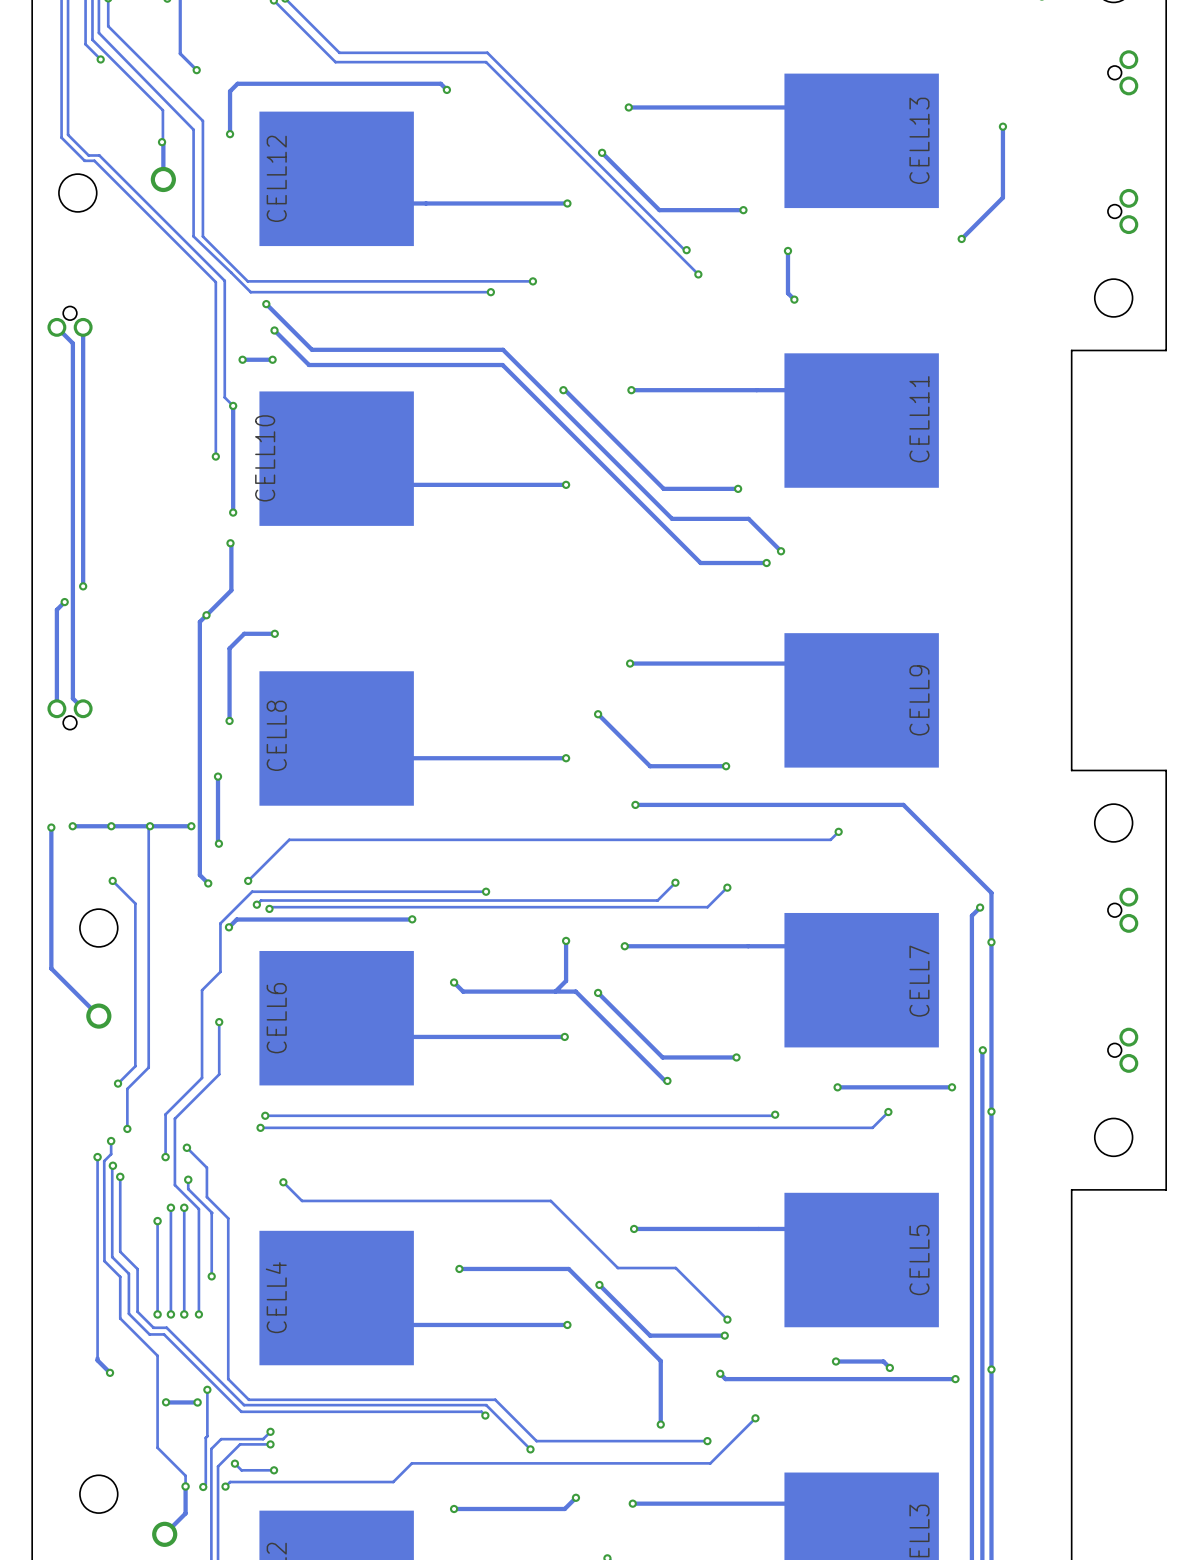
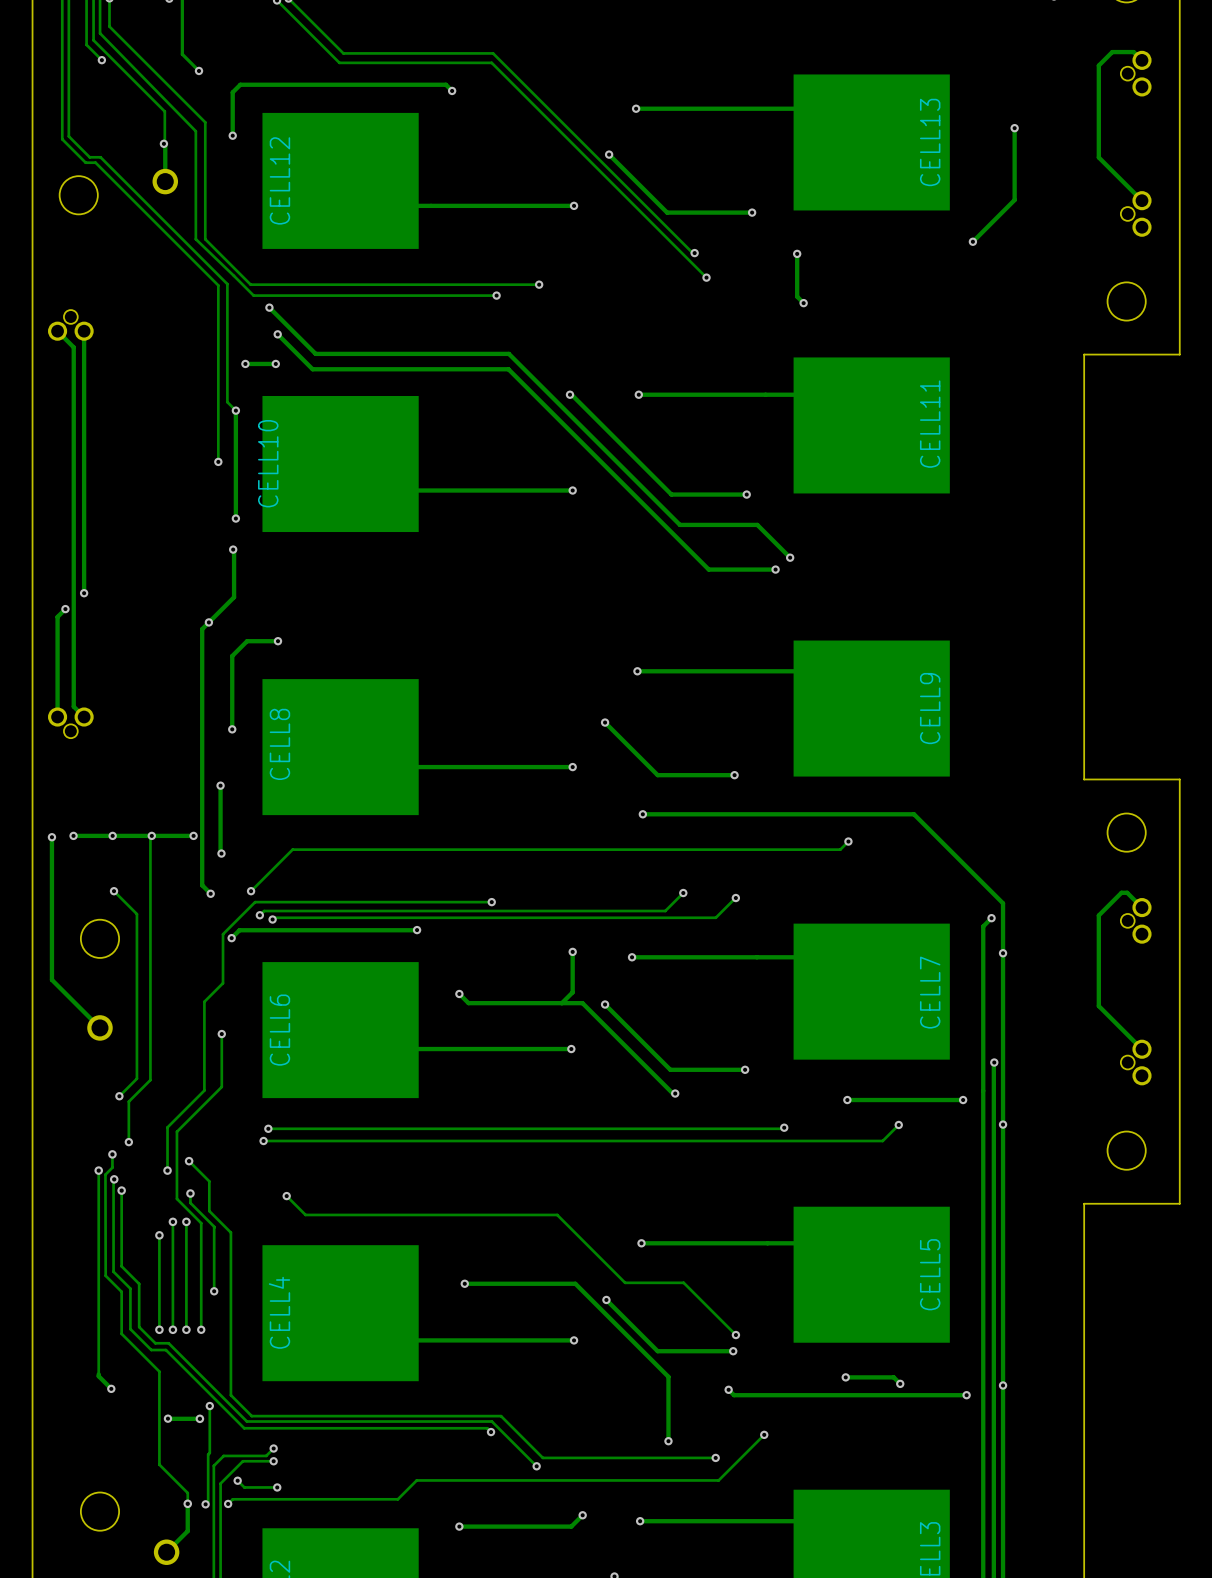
track: none -> (1141, 60) (1133, 52) (1112, 52) (1098, 65) (1098, 157) (1141, 200)
track: none -> (1141, 907) (1127, 892) (1121, 892) (1098, 915) (1098, 1006) (1141, 1049)

